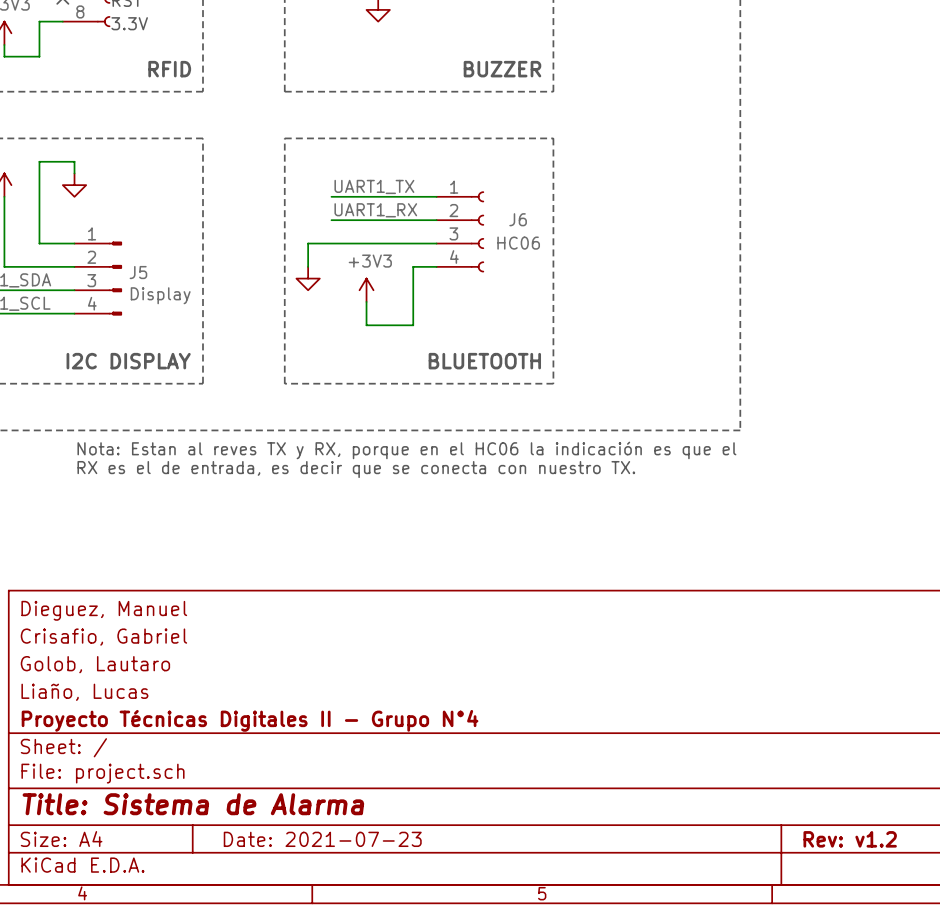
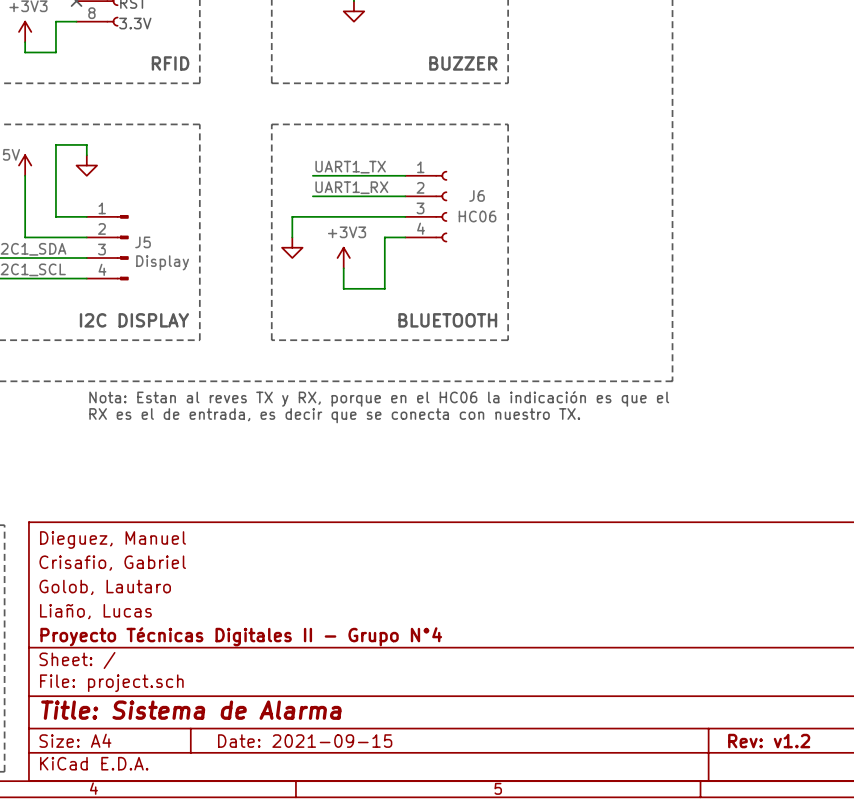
title block: Date: 2021-07-23 (322, 839) -> Date: 2021-09-15 (305, 741)

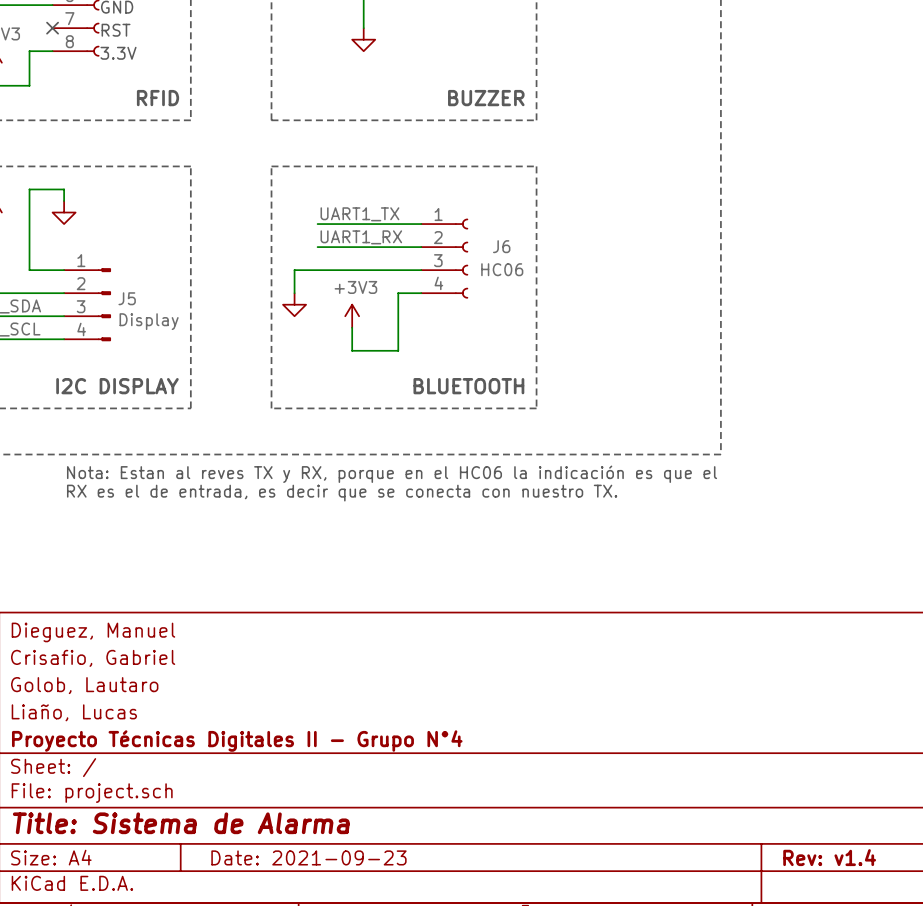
title block: Date: 2021-09-15 (305, 741) -> Date: 2021-09-23 (308, 857)
title block: Rev: v1.2 (769, 741) -> Rev: v1.4 (829, 857)

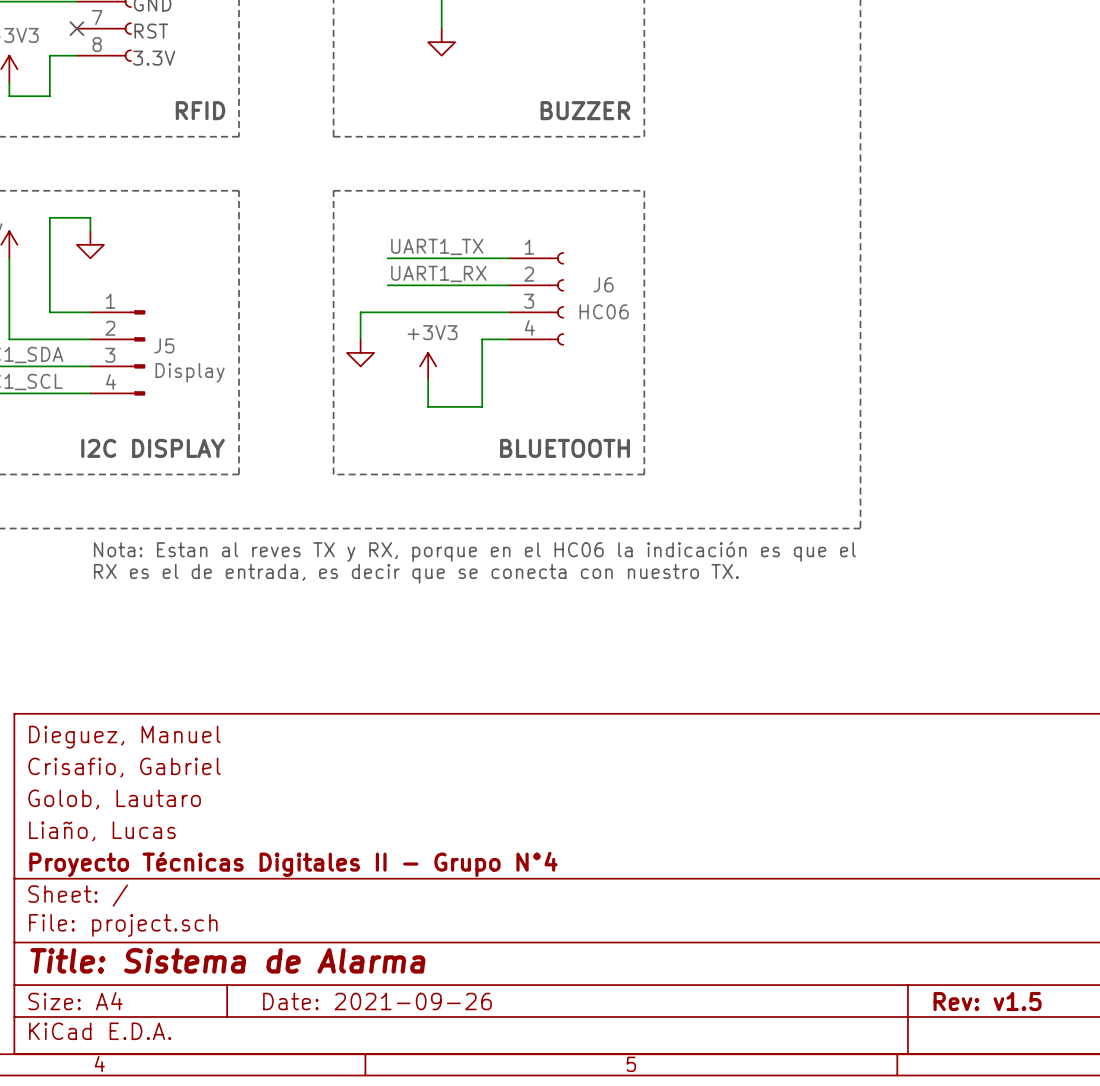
title block: Date: 2021-09-23 (308, 857) -> Date: 2021-09-26 (377, 1001)
title block: Rev: v1.4 (829, 857) -> Rev: v1.5 (987, 1001)

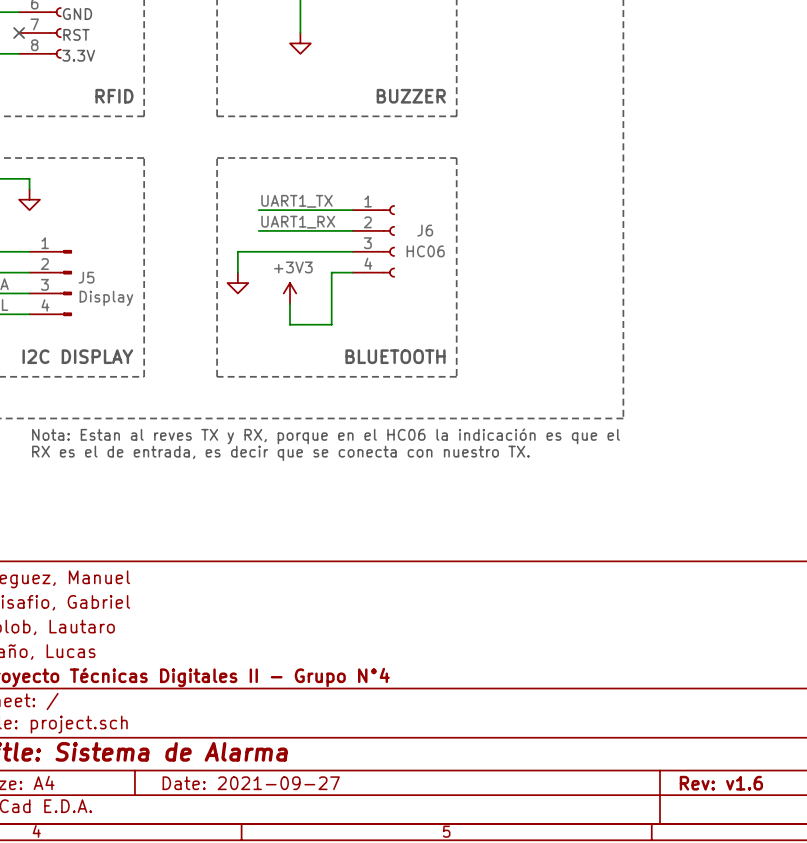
title block: Date: 2021-09-26 (377, 1001) -> Date: 2021-09-27 (251, 783)
title block: Rev: v1.5 (987, 1001) -> Rev: v1.6 (721, 783)

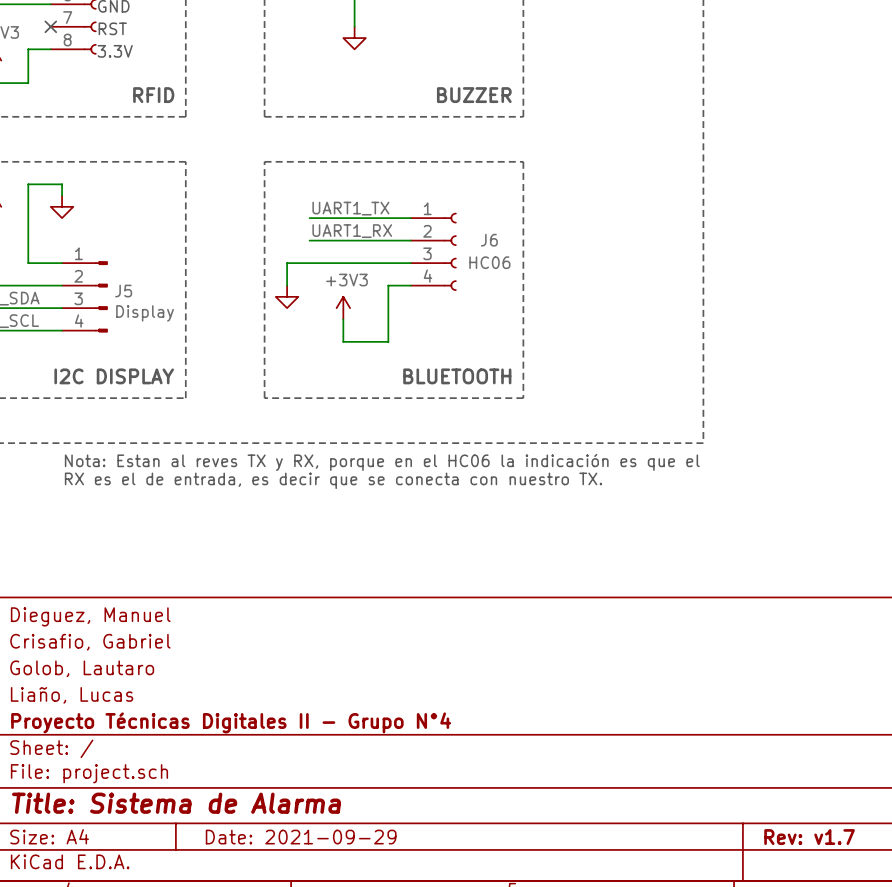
title block: Date: 2021-09-27 (251, 783) -> Date: 2021-09-29 (301, 837)
title block: Rev: v1.6 (721, 783) -> Rev: v1.7 (809, 837)

